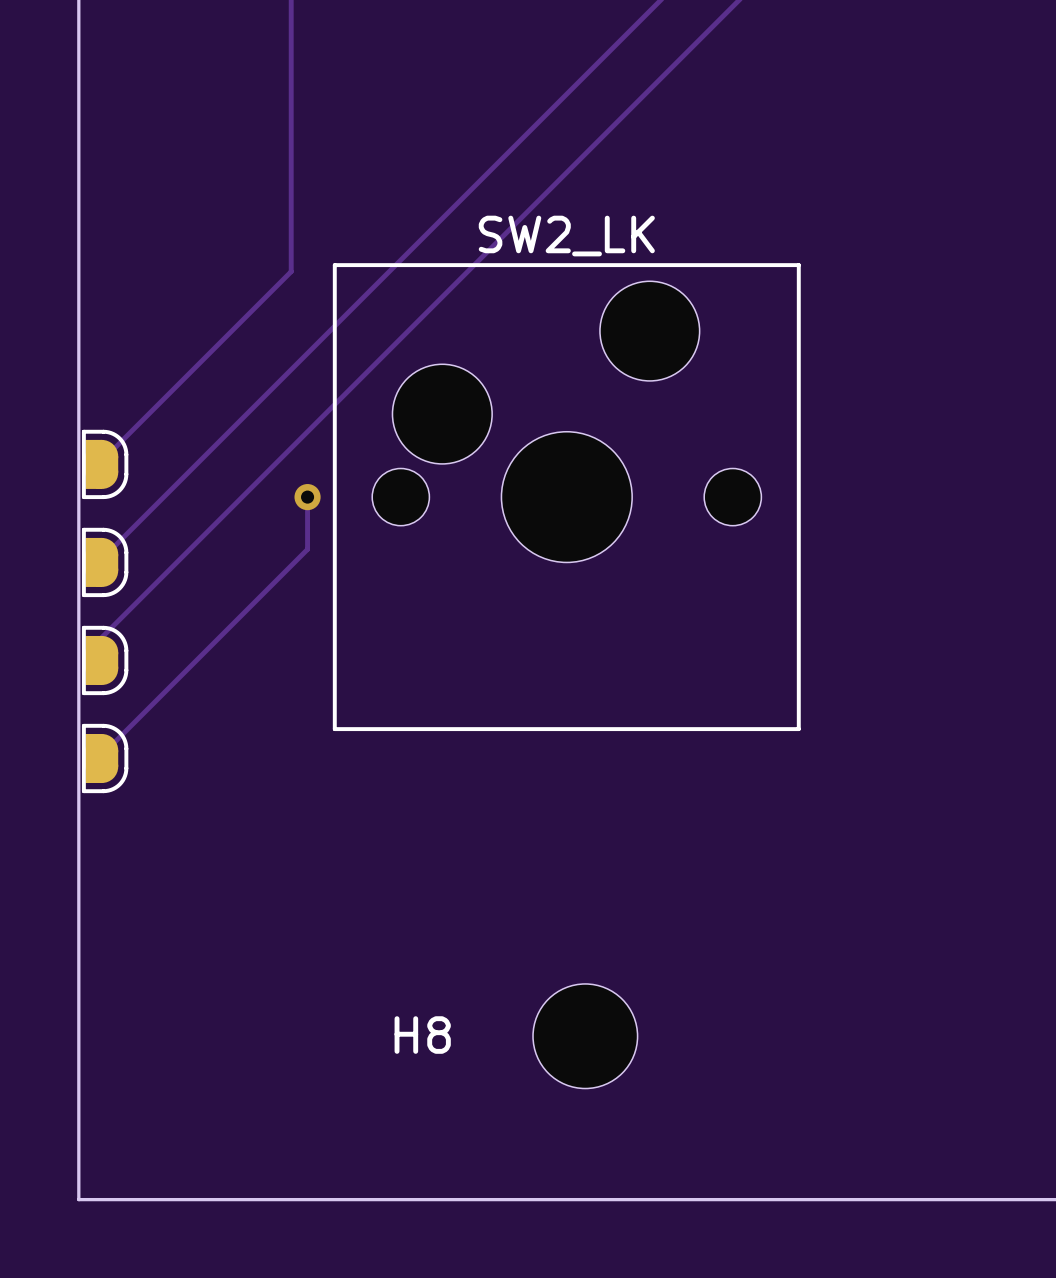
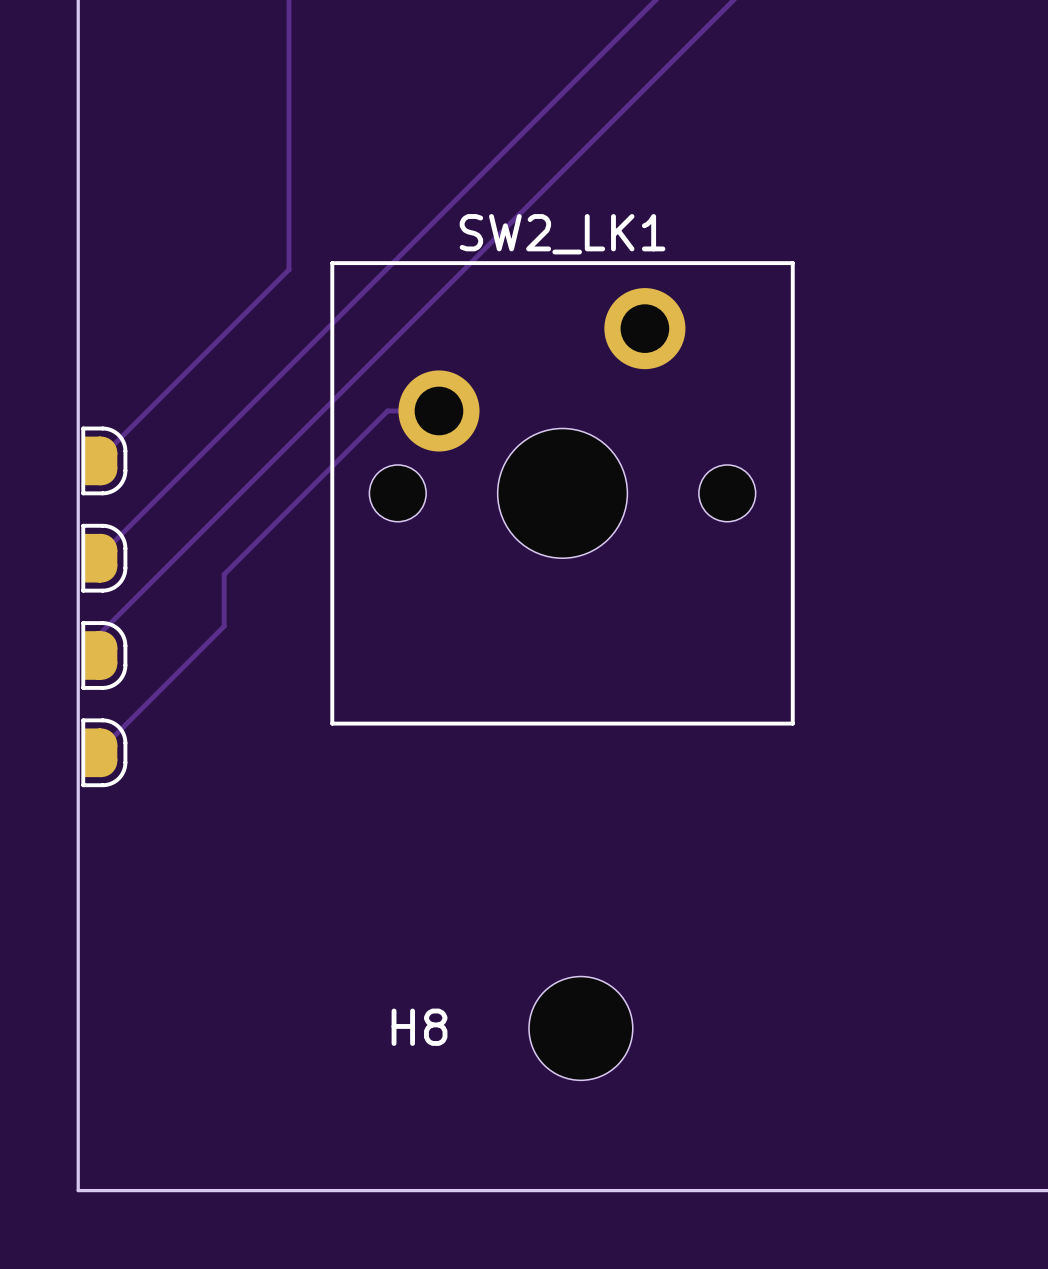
track: (307, 497) (307, 549) (225, 631) -> (438, 410) (387, 410) (224, 574) (224, 626)
via: (307, 497) -> none
SW2_LK: (566, 497) -> none
SW2_LK1: none -> (562, 493)

